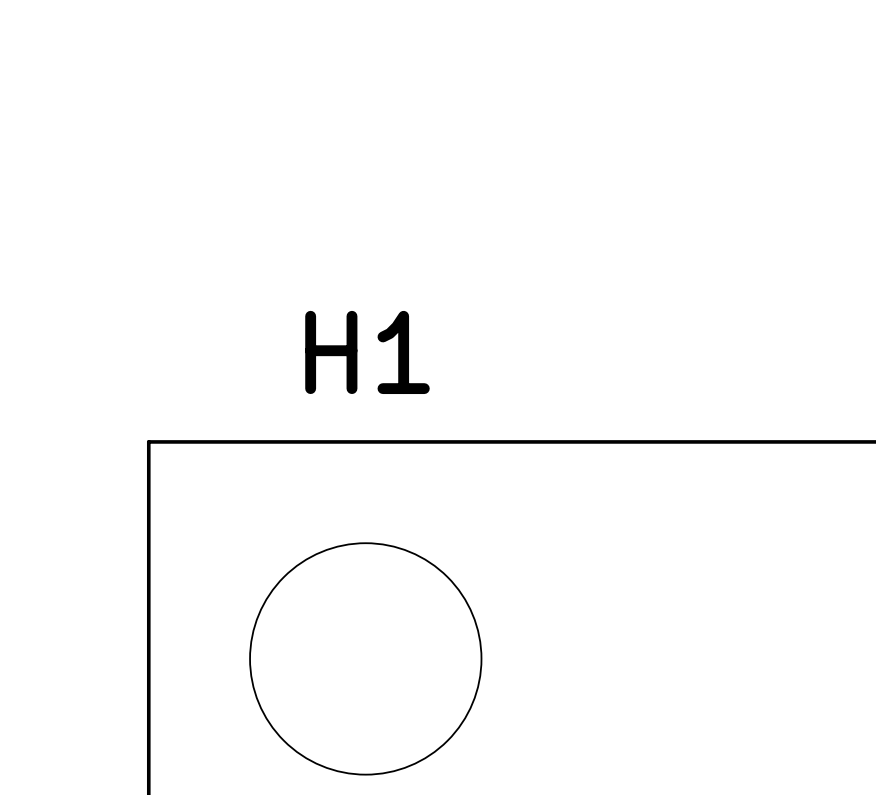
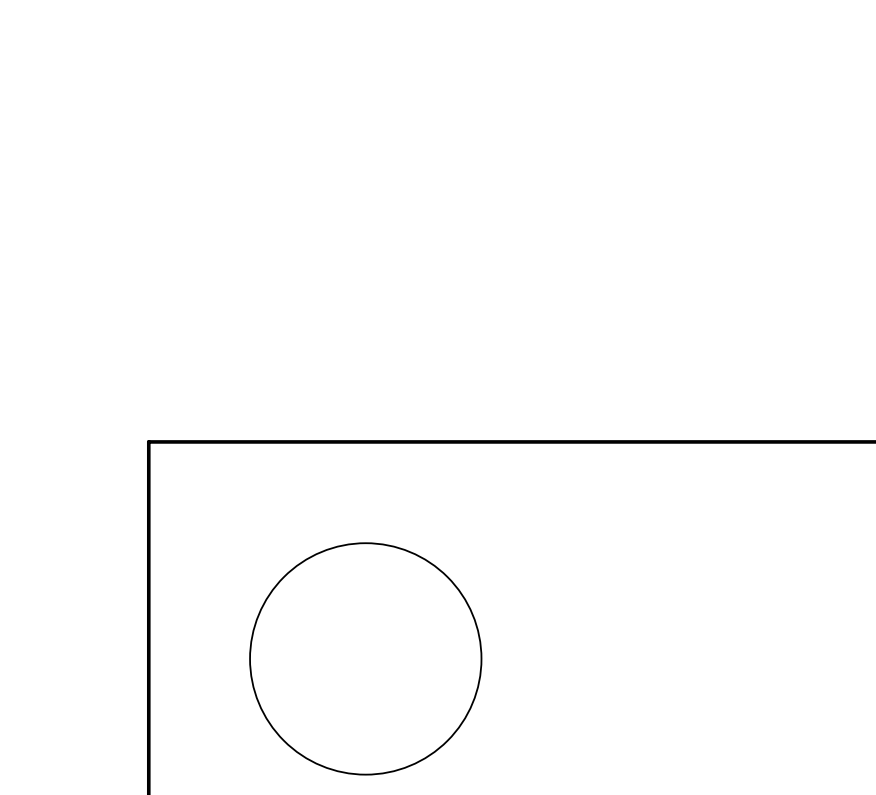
H1 name: H1 (367, 352) -> none

